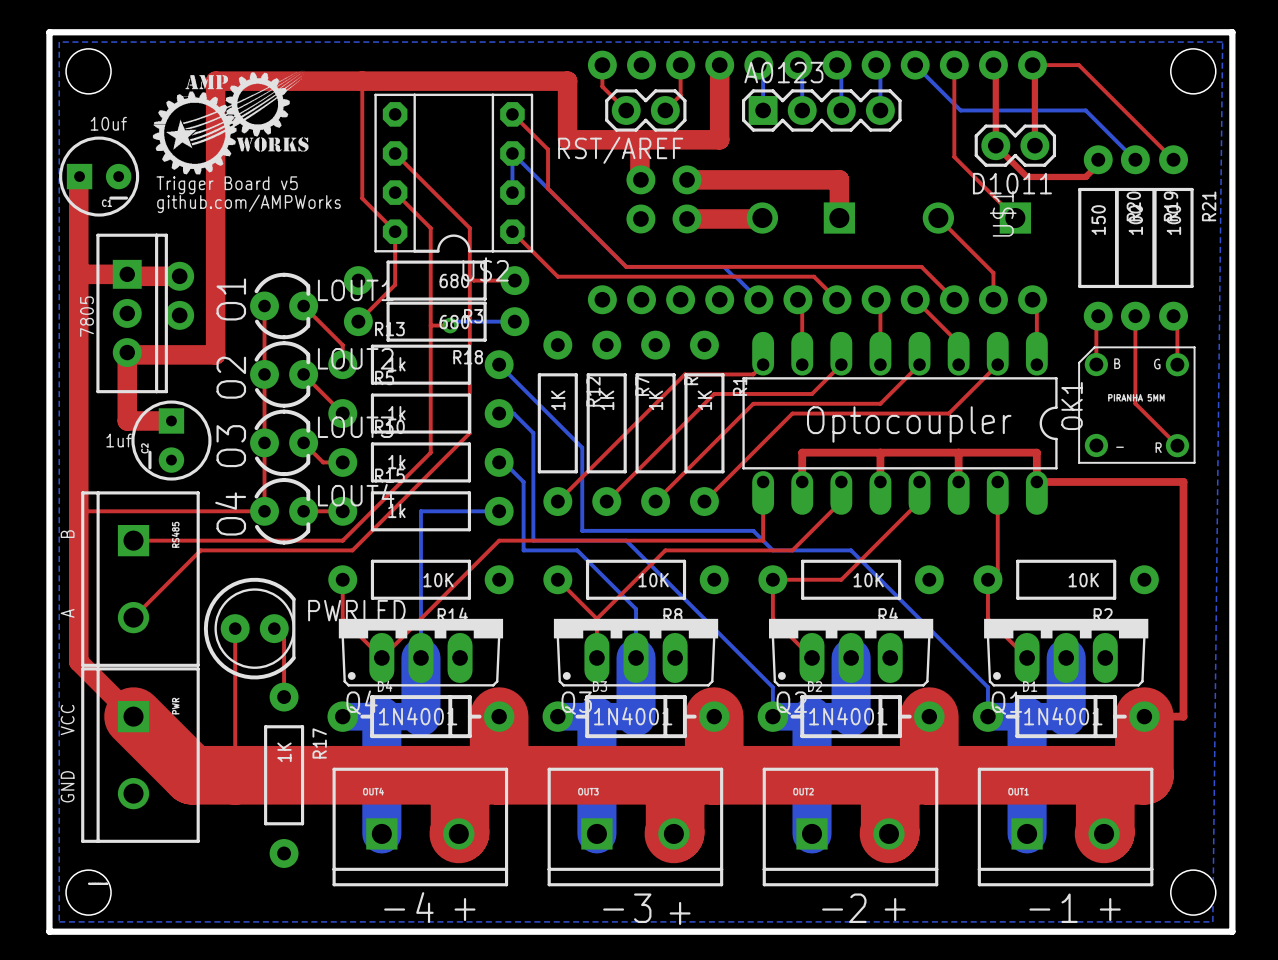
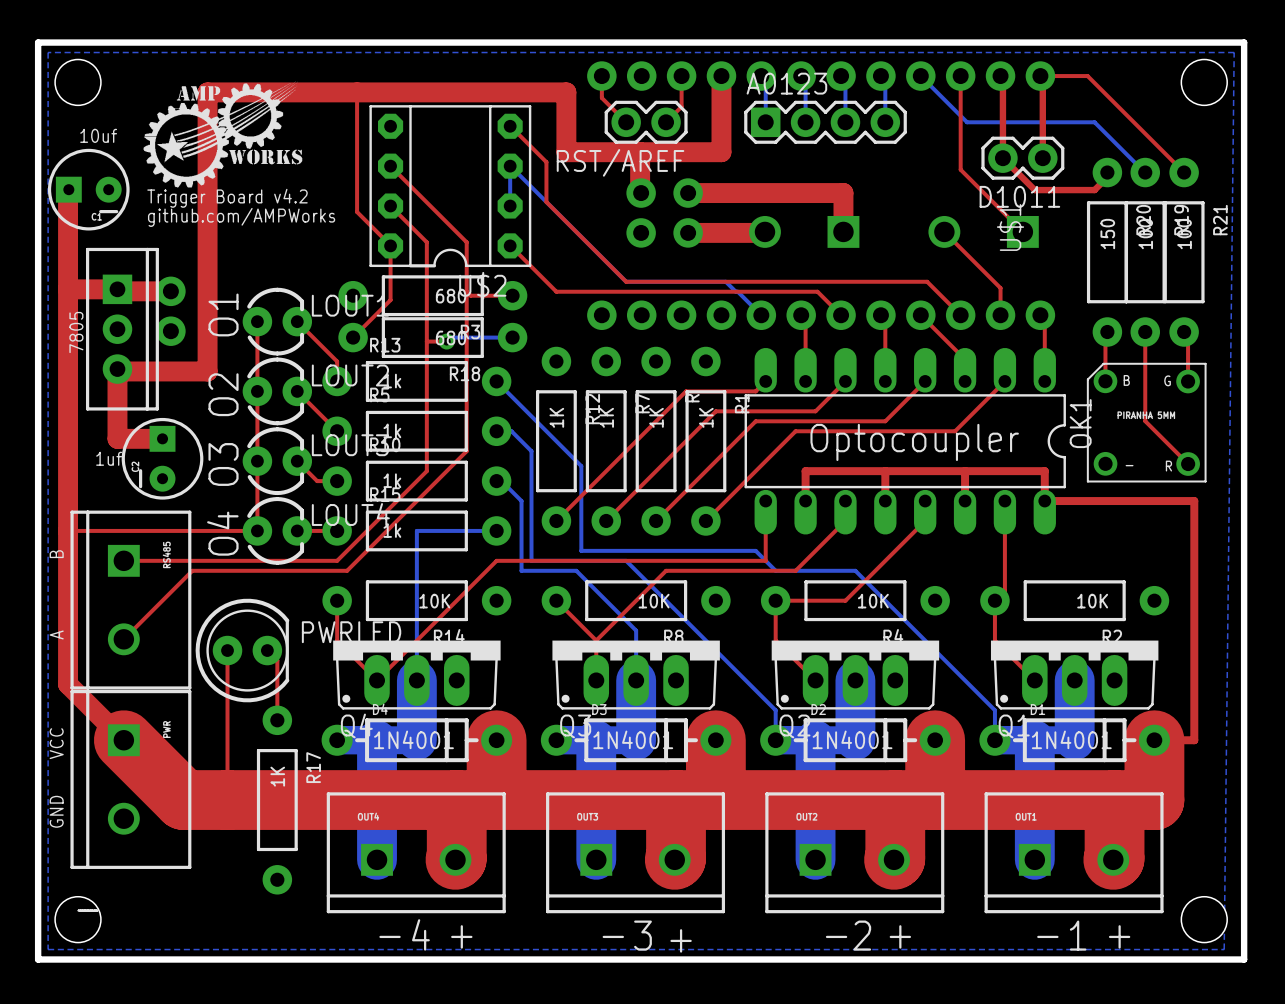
text: Trigger Board v5 (227, 185) -> Trigger Board v4.2 (227, 198)

